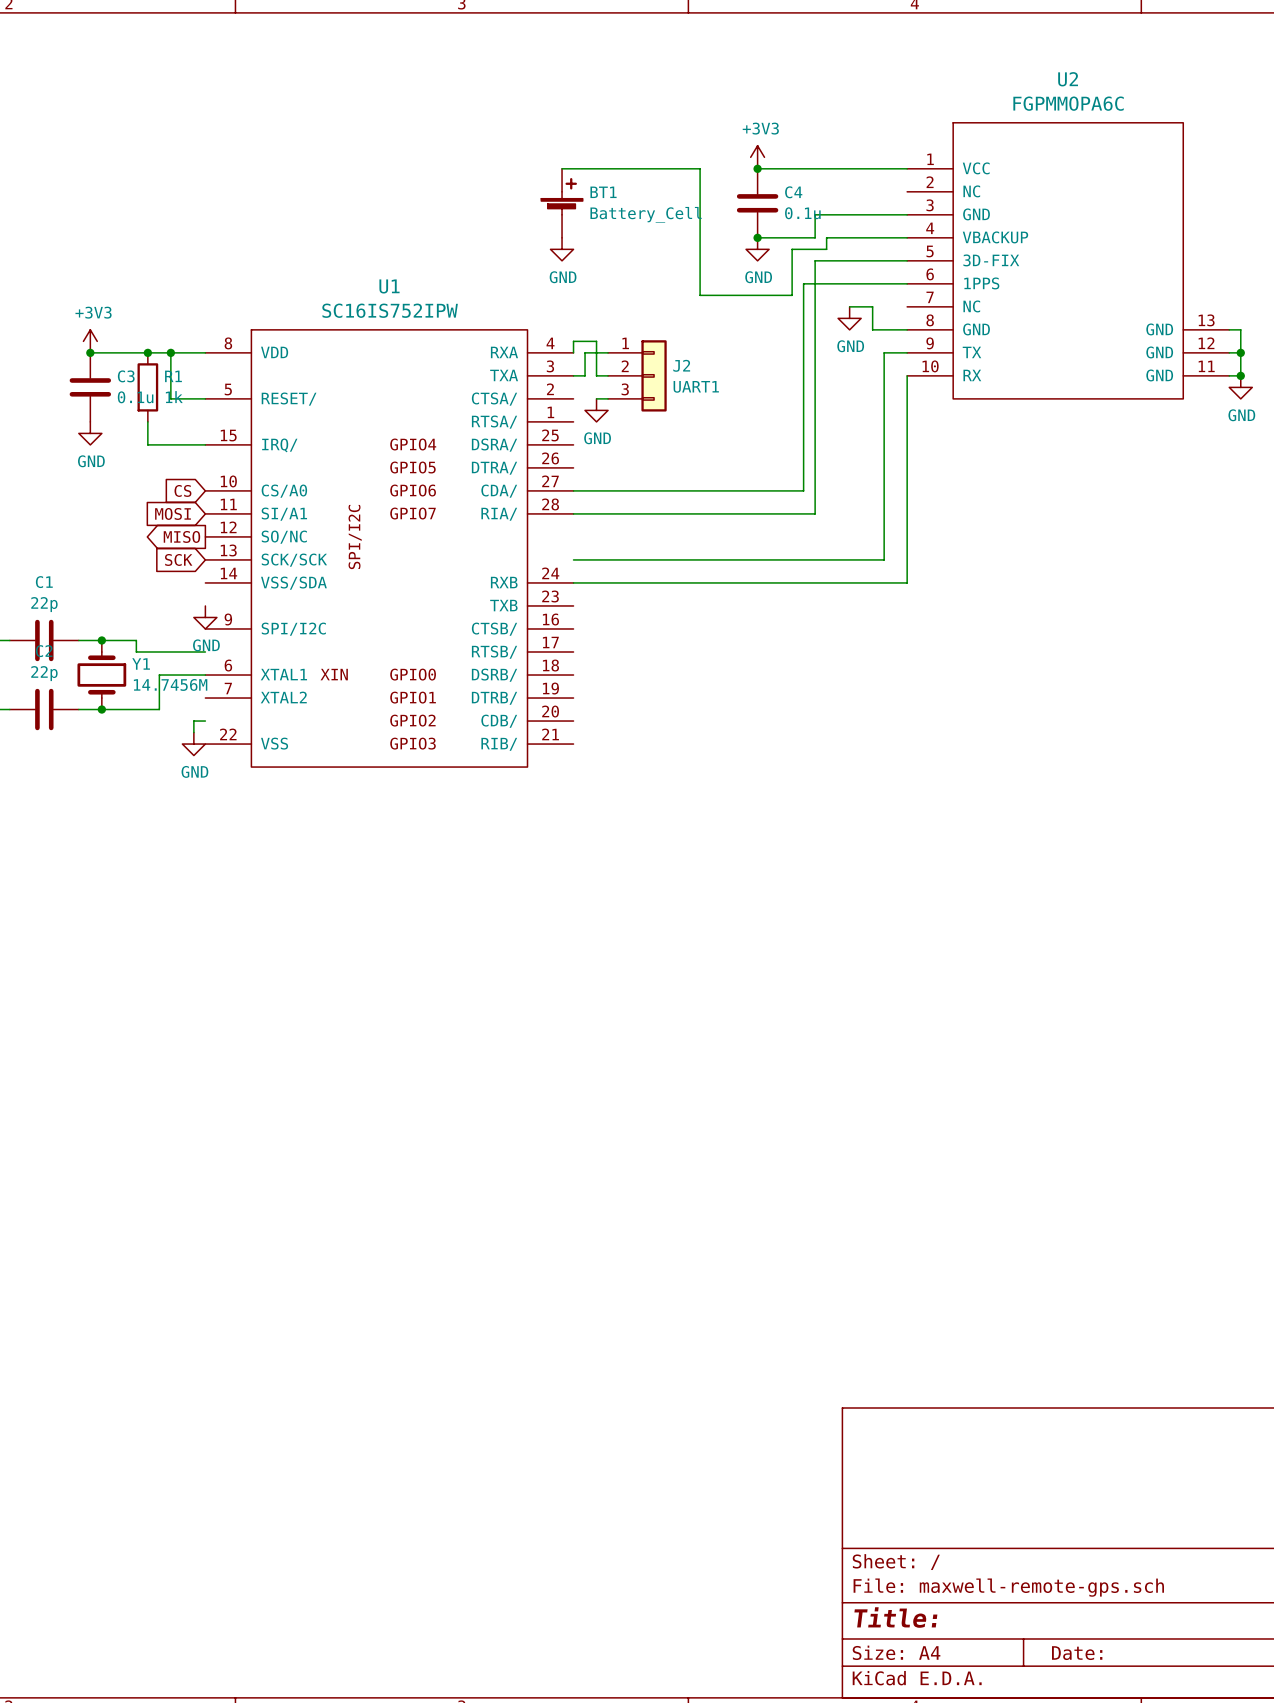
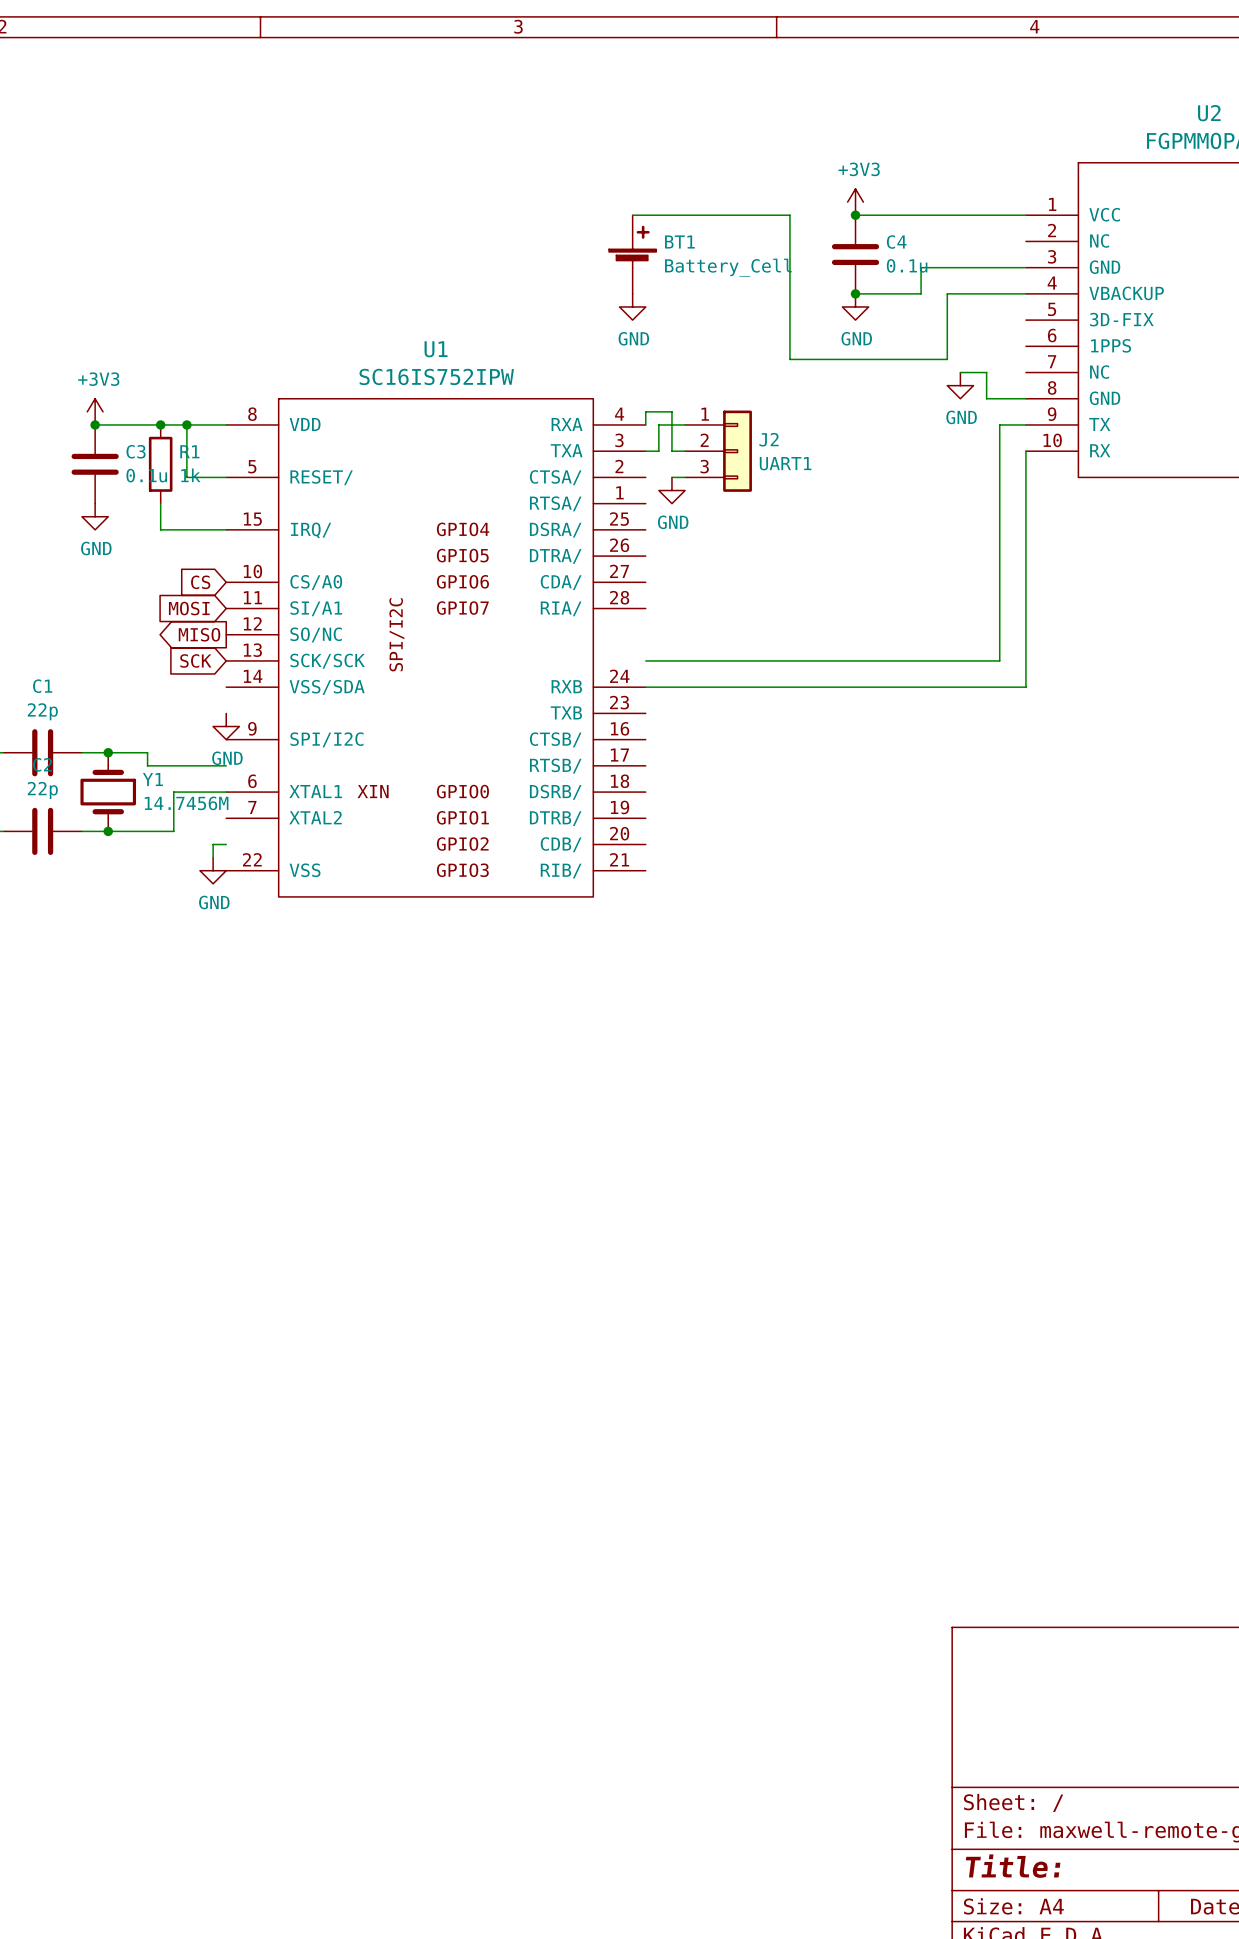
wire: (838, 237) (826, 237) (826, 249) (792, 249) (792, 295) -> (947, 293) (947, 359) (894, 359)
wire: (907, 260) (815, 260) (815, 513) (573, 513) -> none
wire: (907, 283) (803, 283) (803, 490) (573, 490) -> none

